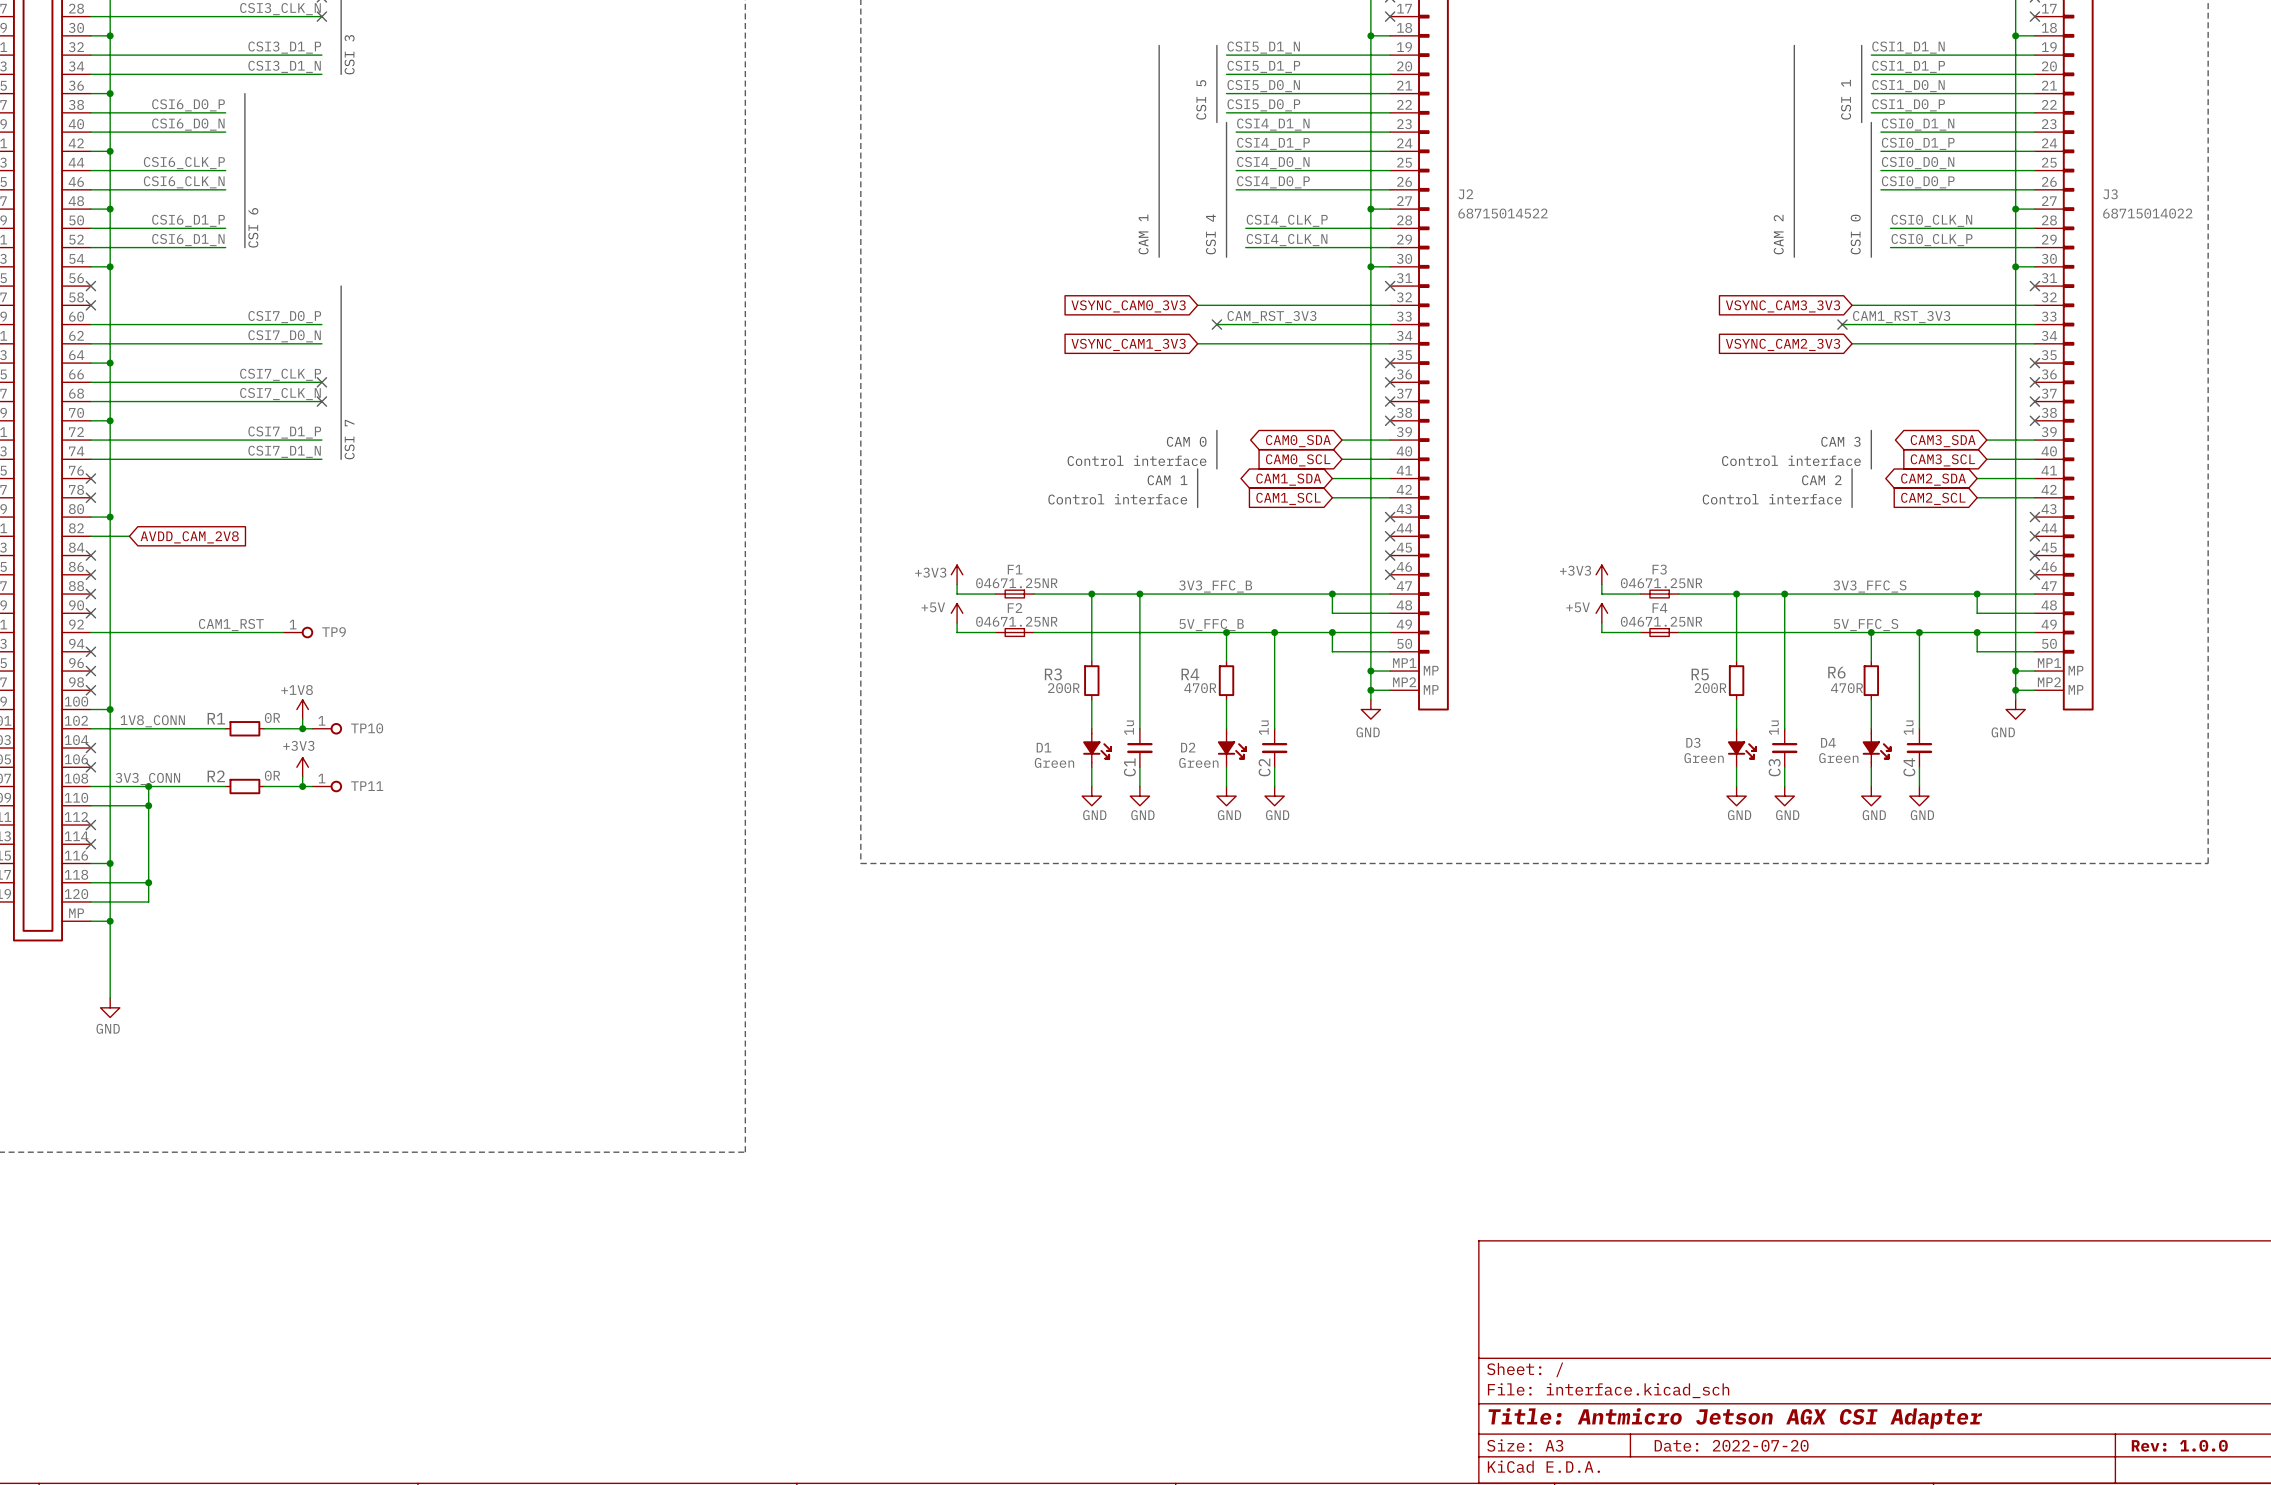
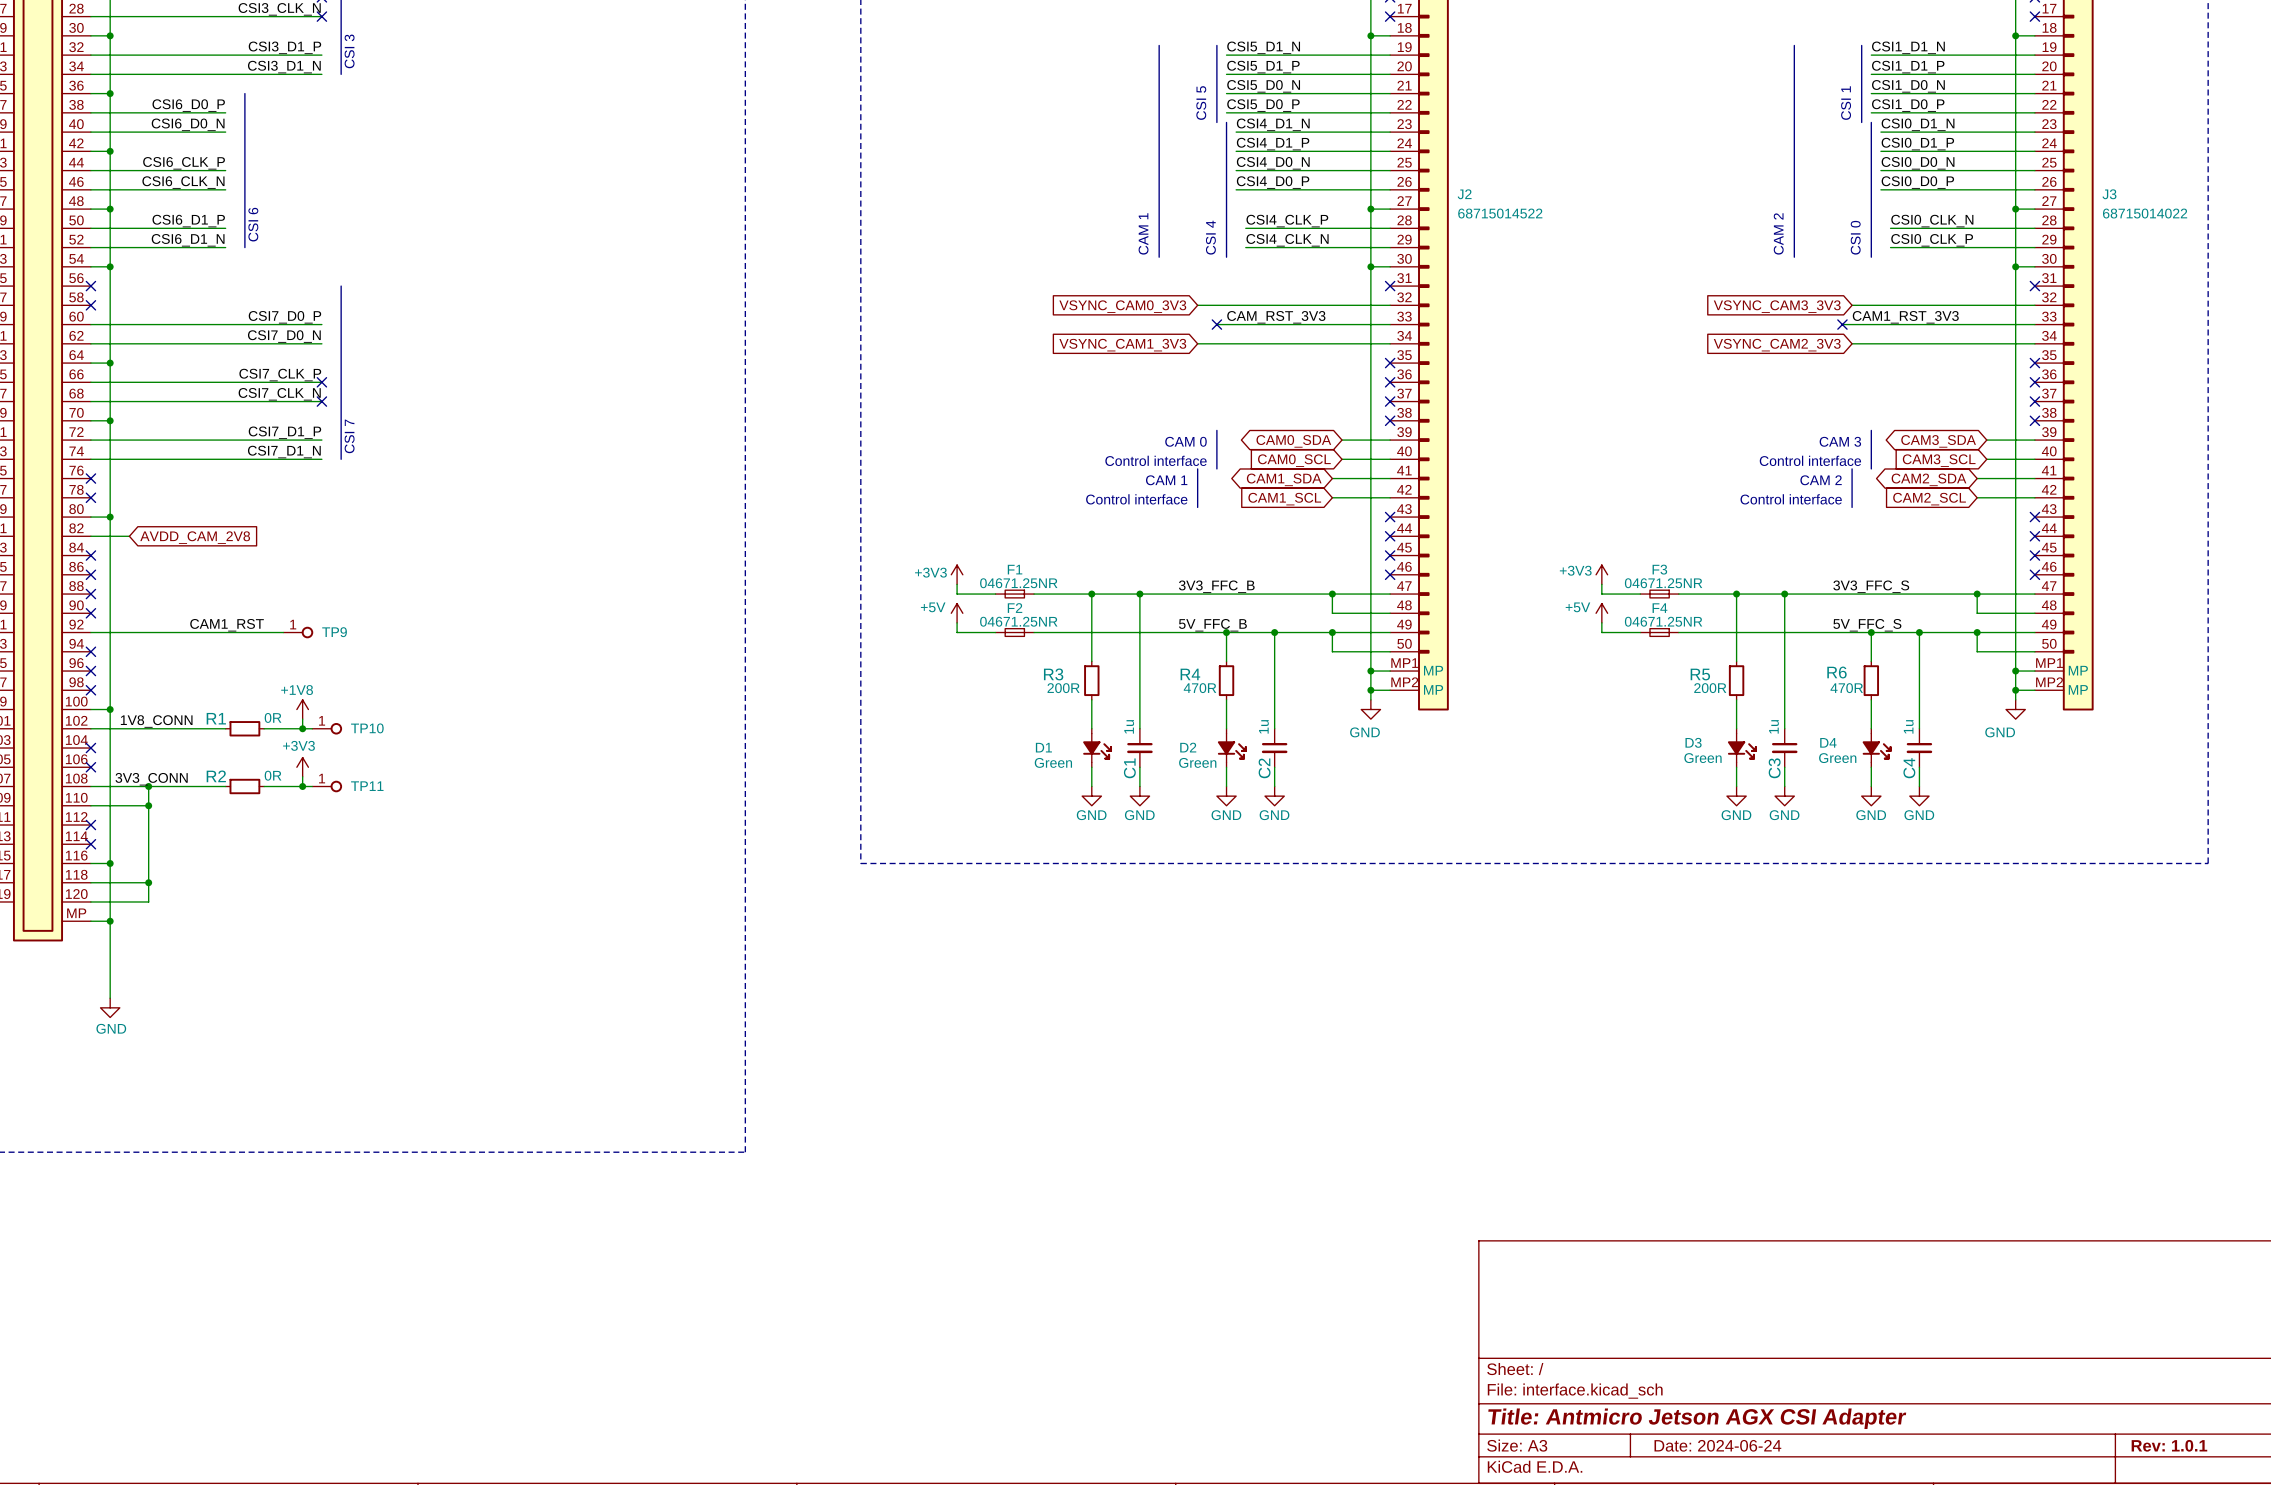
title block: Date: 2022-07-20 (1731, 1445) -> Date: 2024-06-24 (1717, 1445)
title block: Rev: 1.0.0 (2179, 1445) -> Rev: 1.0.1 (2169, 1445)

